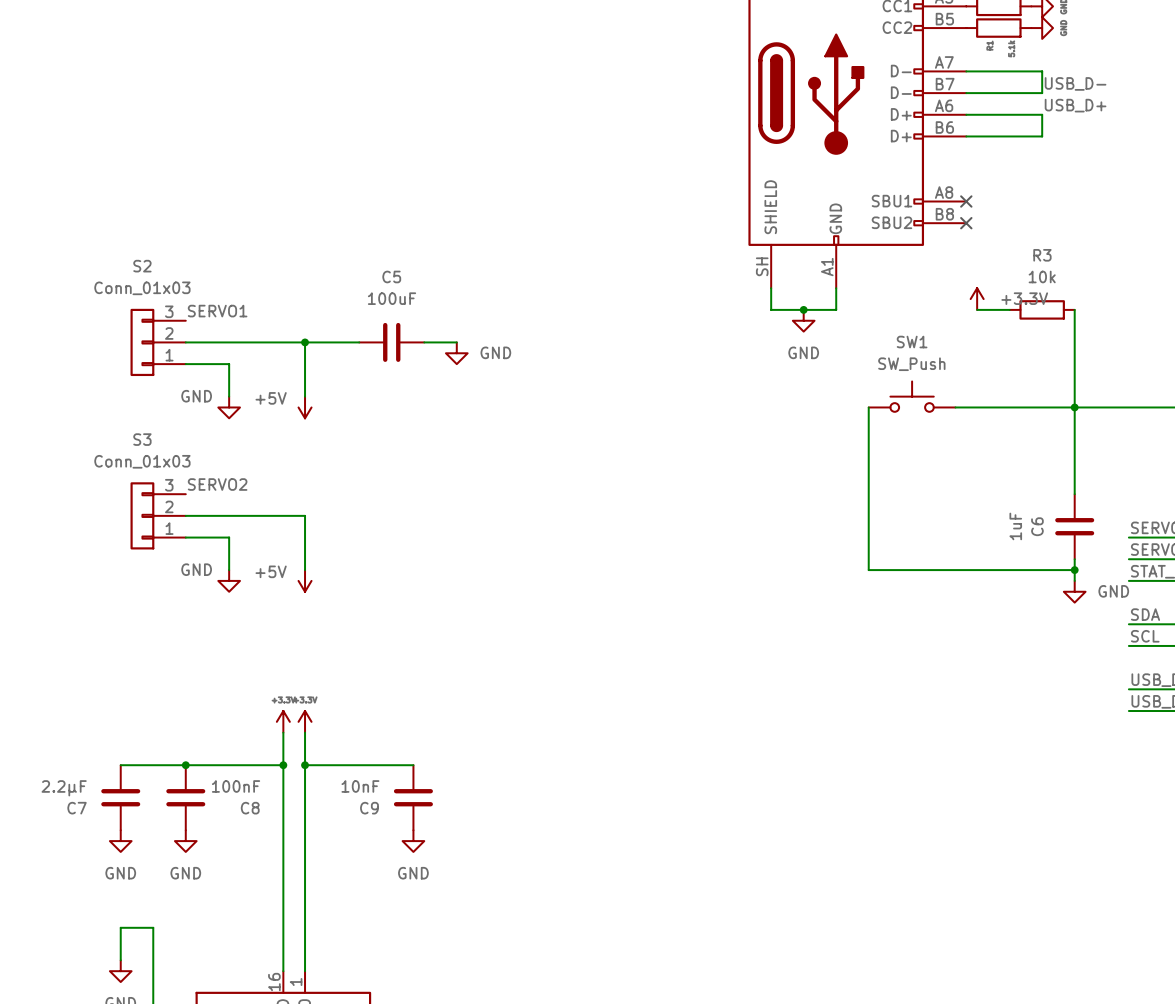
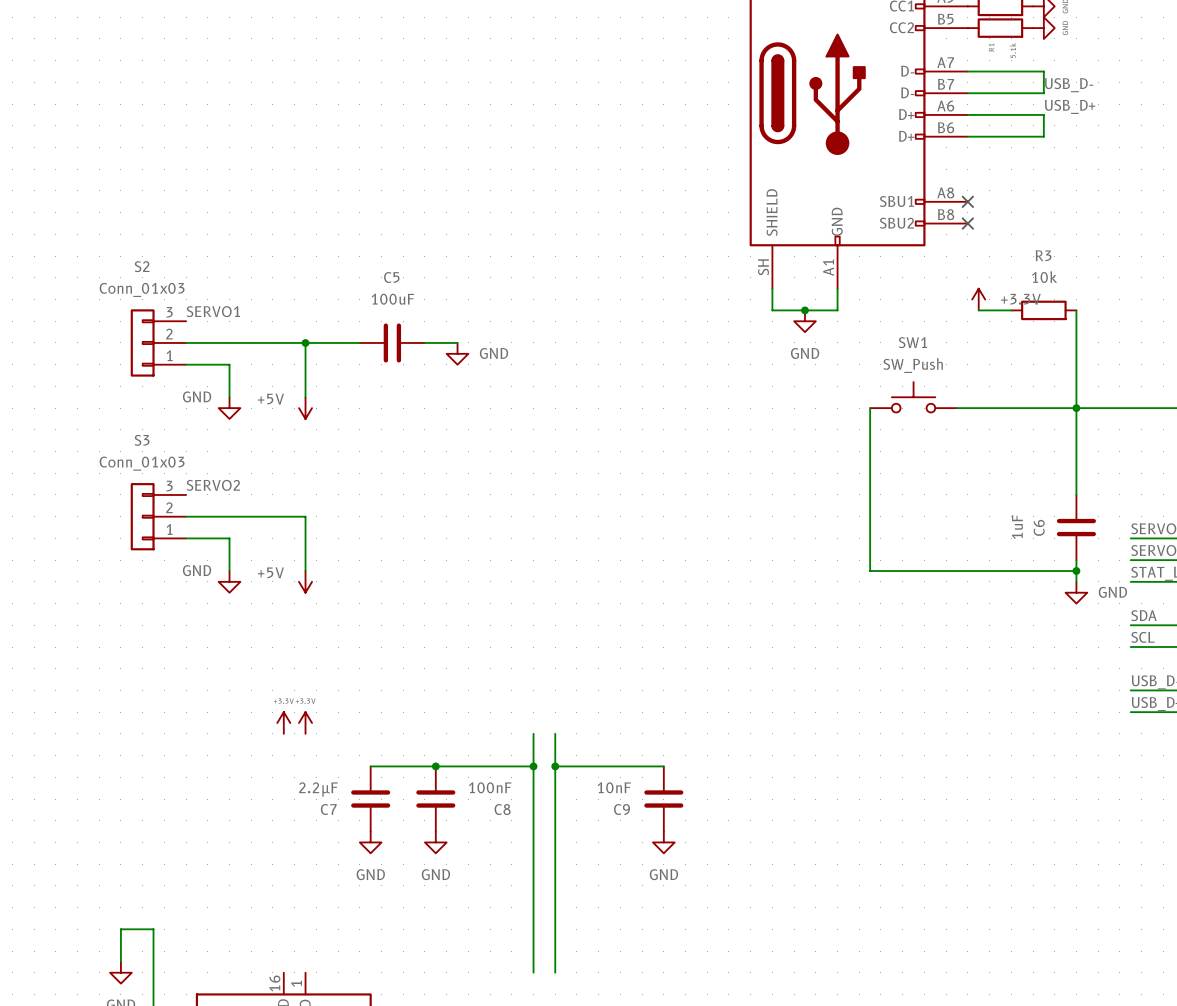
wire: (283, 732) (283, 971) -> none
wire: (305, 732) (305, 971) -> none
wire: none -> (533, 733) (533, 972)
wire: none -> (555, 733) (555, 972)
wire: (120, 765) (283, 765) -> none
junction: (185, 765) -> none
junction: (283, 765) -> none
wire: (305, 765) (370, 765) -> none
junction: (305, 765) -> none
wire: none -> (414, 766) (533, 766)
junction: none -> (435, 766)
junction: none -> (533, 766)
wire: none -> (555, 766) (663, 766)
junction: none -> (555, 766)
C7 position: (120, 797) -> (370, 799)
C8 position: (185, 797) -> (435, 799)
C9 position: (413, 797) -> (663, 799)
power symbol: GND (120, 841) -> none
power symbol: GND (185, 841) -> none
power symbol: none -> GND (370, 842)
power symbol: GND (413, 841) -> none
power symbol: none -> GND (435, 842)
power symbol: none -> GND (663, 842)

